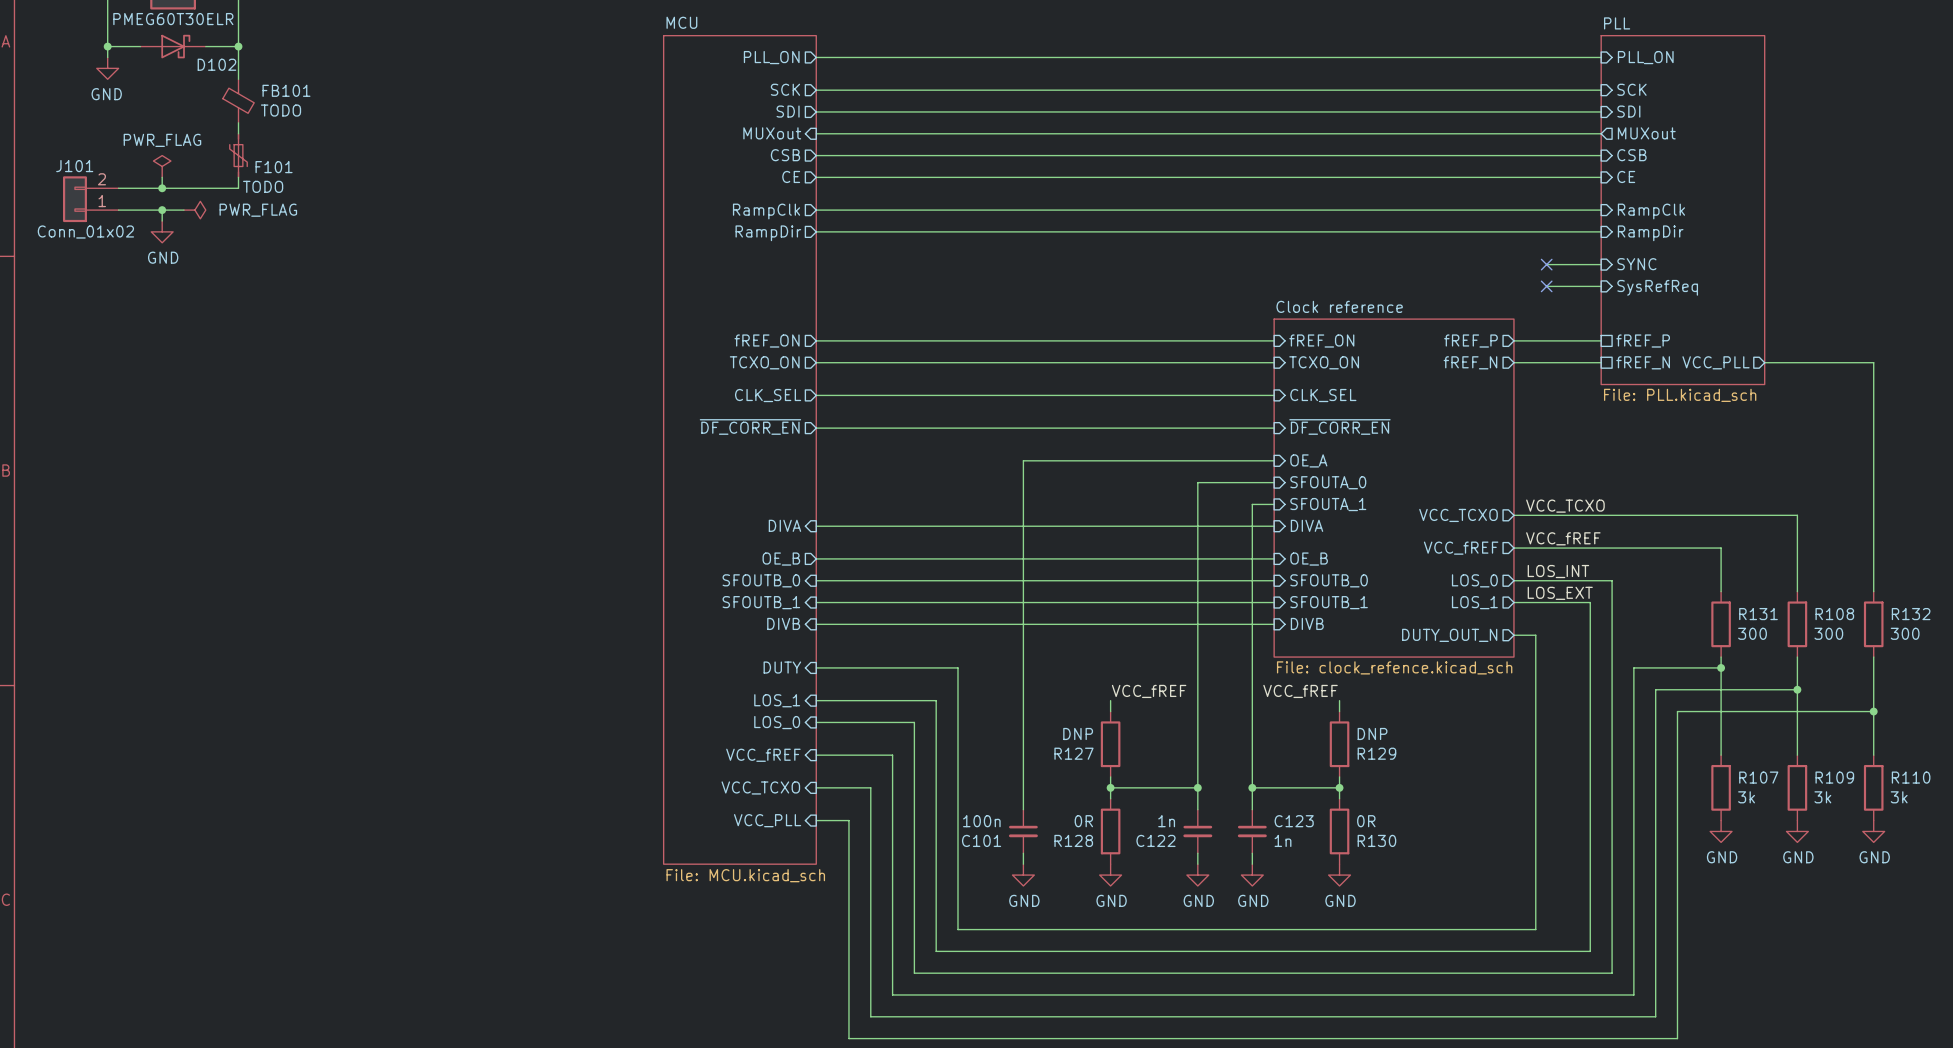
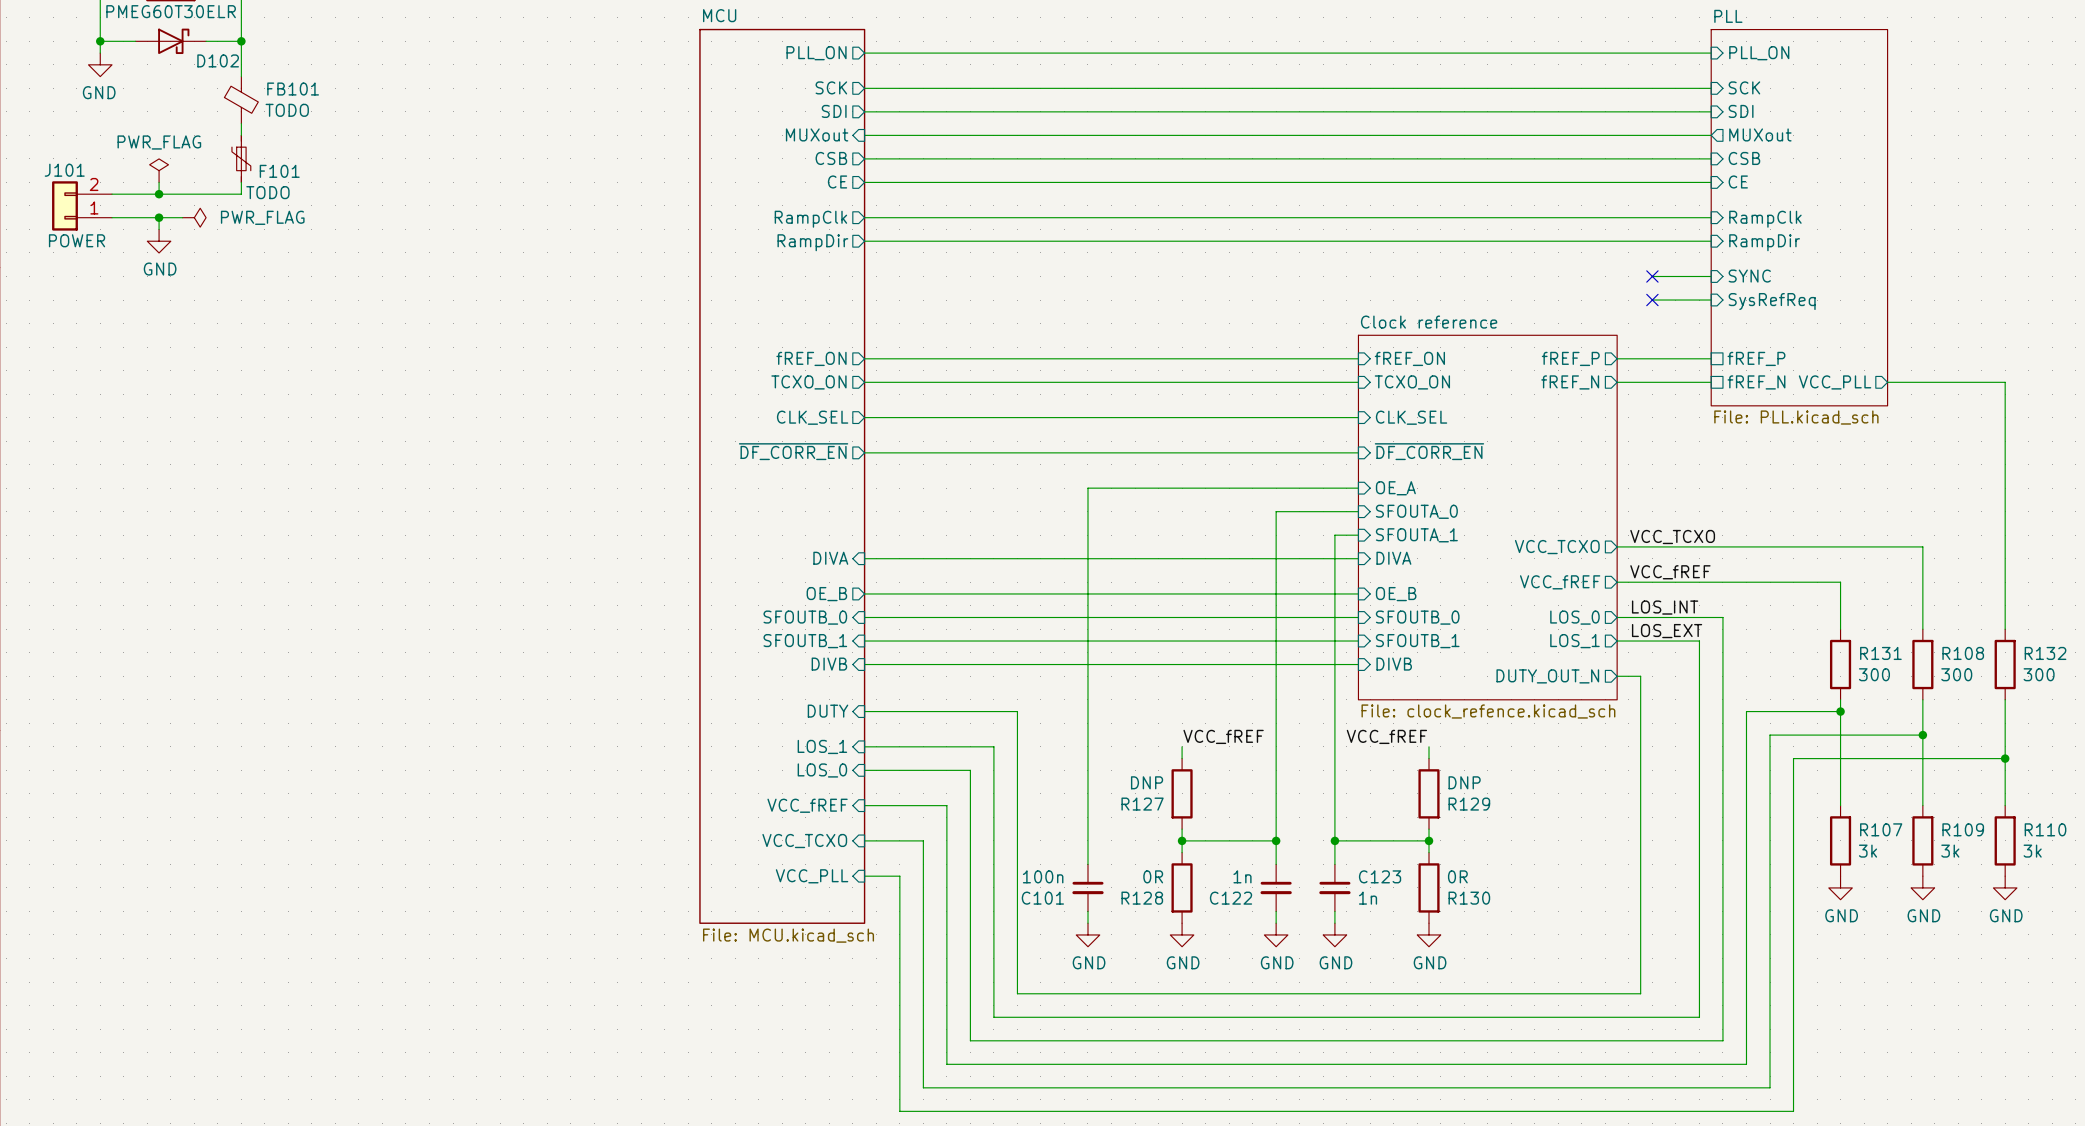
J101 value: Conn_01x02 (85, 232) -> POWER (77, 240)

